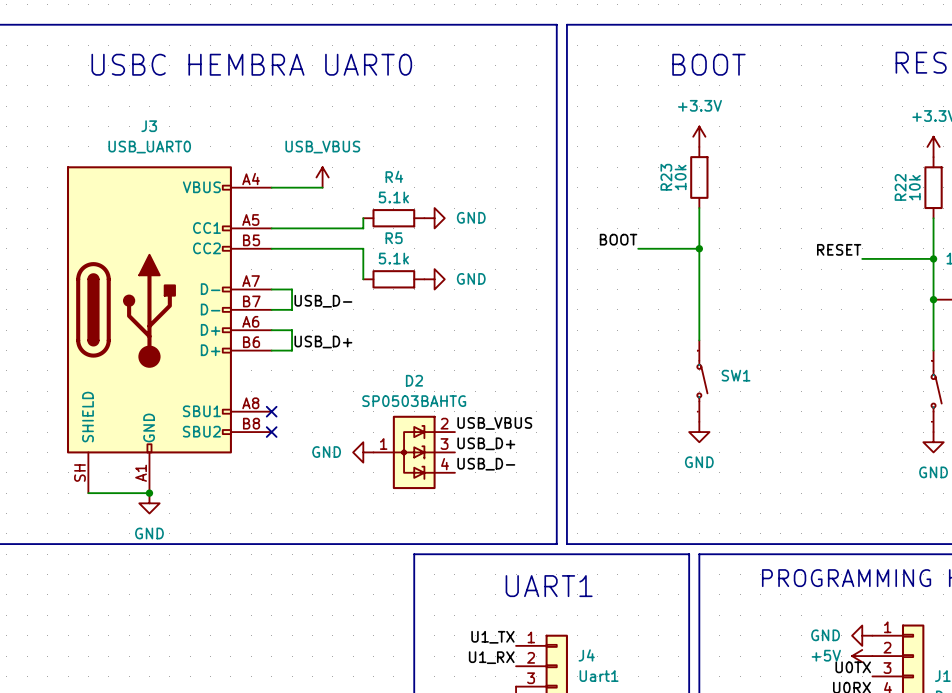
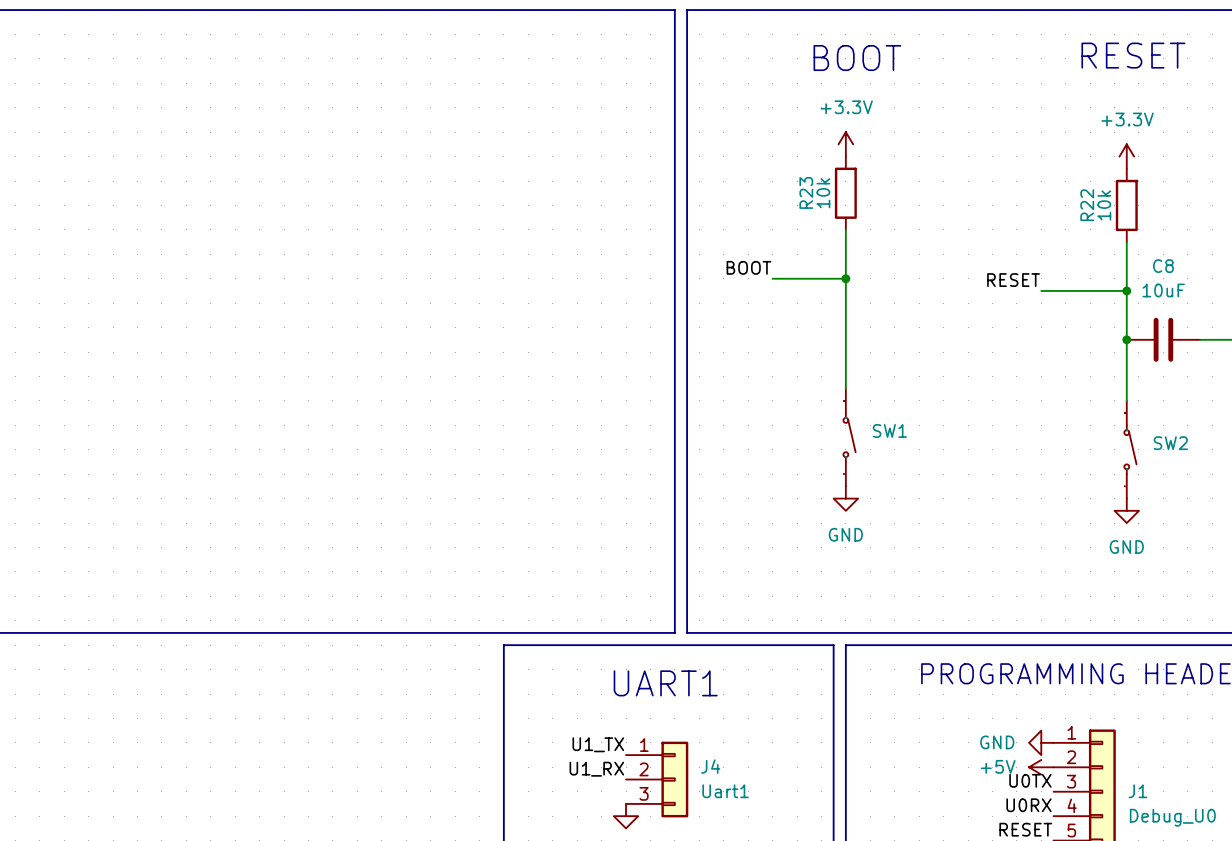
text: USBC HEMBRA UART0 (251, 64) -> none
power symbol: USB_VBUS (322, 177) -> none
wire: (271, 187) (322, 187) -> none
wire: (363, 218) (363, 228) (271, 228) -> none
R4: 5.1k (393, 218) -> none
power symbol: GND (434, 218) -> none
wire: (271, 248) (363, 248) (363, 279) -> none
R5: 5.1k (393, 279) -> none
power symbol: GND (434, 279) -> none
wire: (271, 289) (292, 289) (292, 309) (271, 309) -> none
label: USB_D- (323, 301) -> none
J3: USB_UART0 (169, 329) -> none
wire: (271, 330) (292, 330) (292, 350) (271, 350) -> none
label: USB_D+ (323, 341) -> none
no-connect mark: (271, 411) -> none
label: USB_VBUS (494, 423) -> none
no-connect mark: (271, 432) -> none
label: USB_D+ (486, 443) -> none
power symbol: GND (363, 452) -> none
D2: SP0503BAHTG (414, 452) -> none
label: USB_D- (486, 464) -> none
wire: (88, 493) (149, 493) -> none
junction: (149, 493) -> none
power symbol: GND (149, 503) -> none

